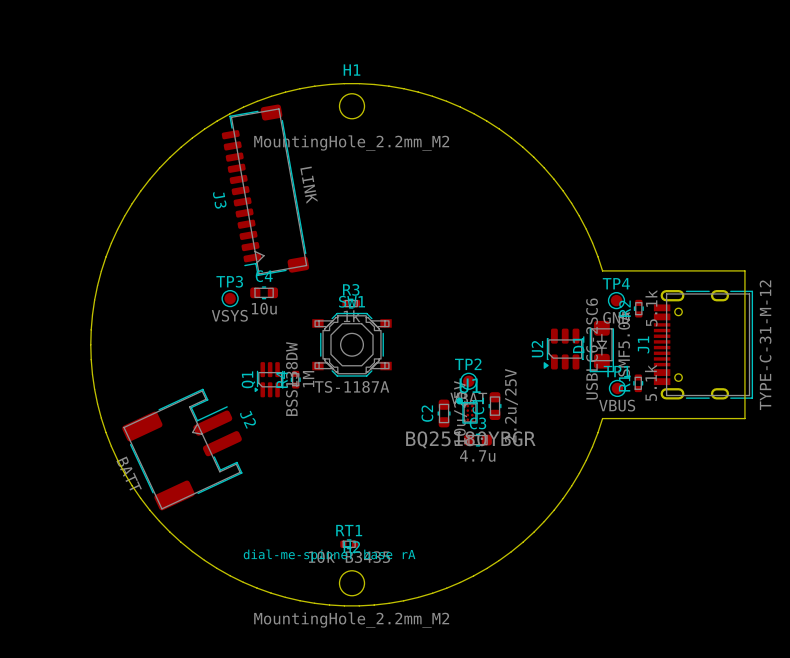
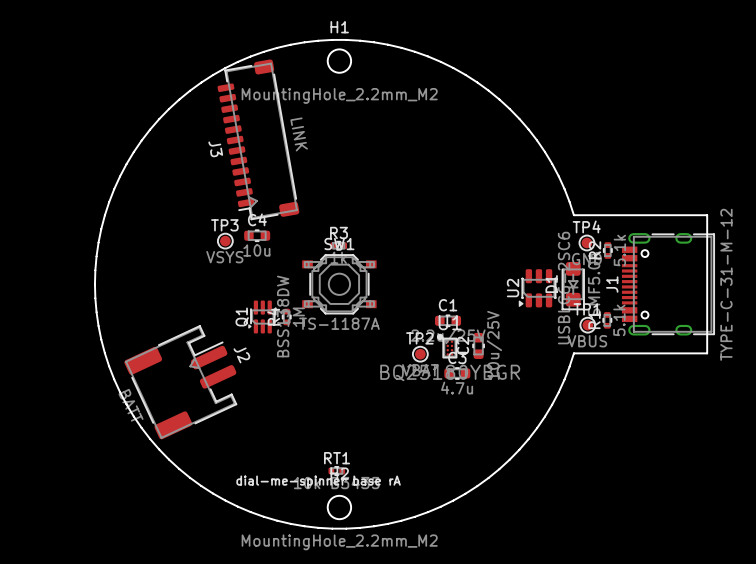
TP2 position: (468, 381) -> (420, 354)
C1 rotation: 0° (495, 406) -> 90° clockwise (448, 320)
C1 position: (495, 406) -> (448, 320)
C2 position: (444, 413) -> (478, 345)

